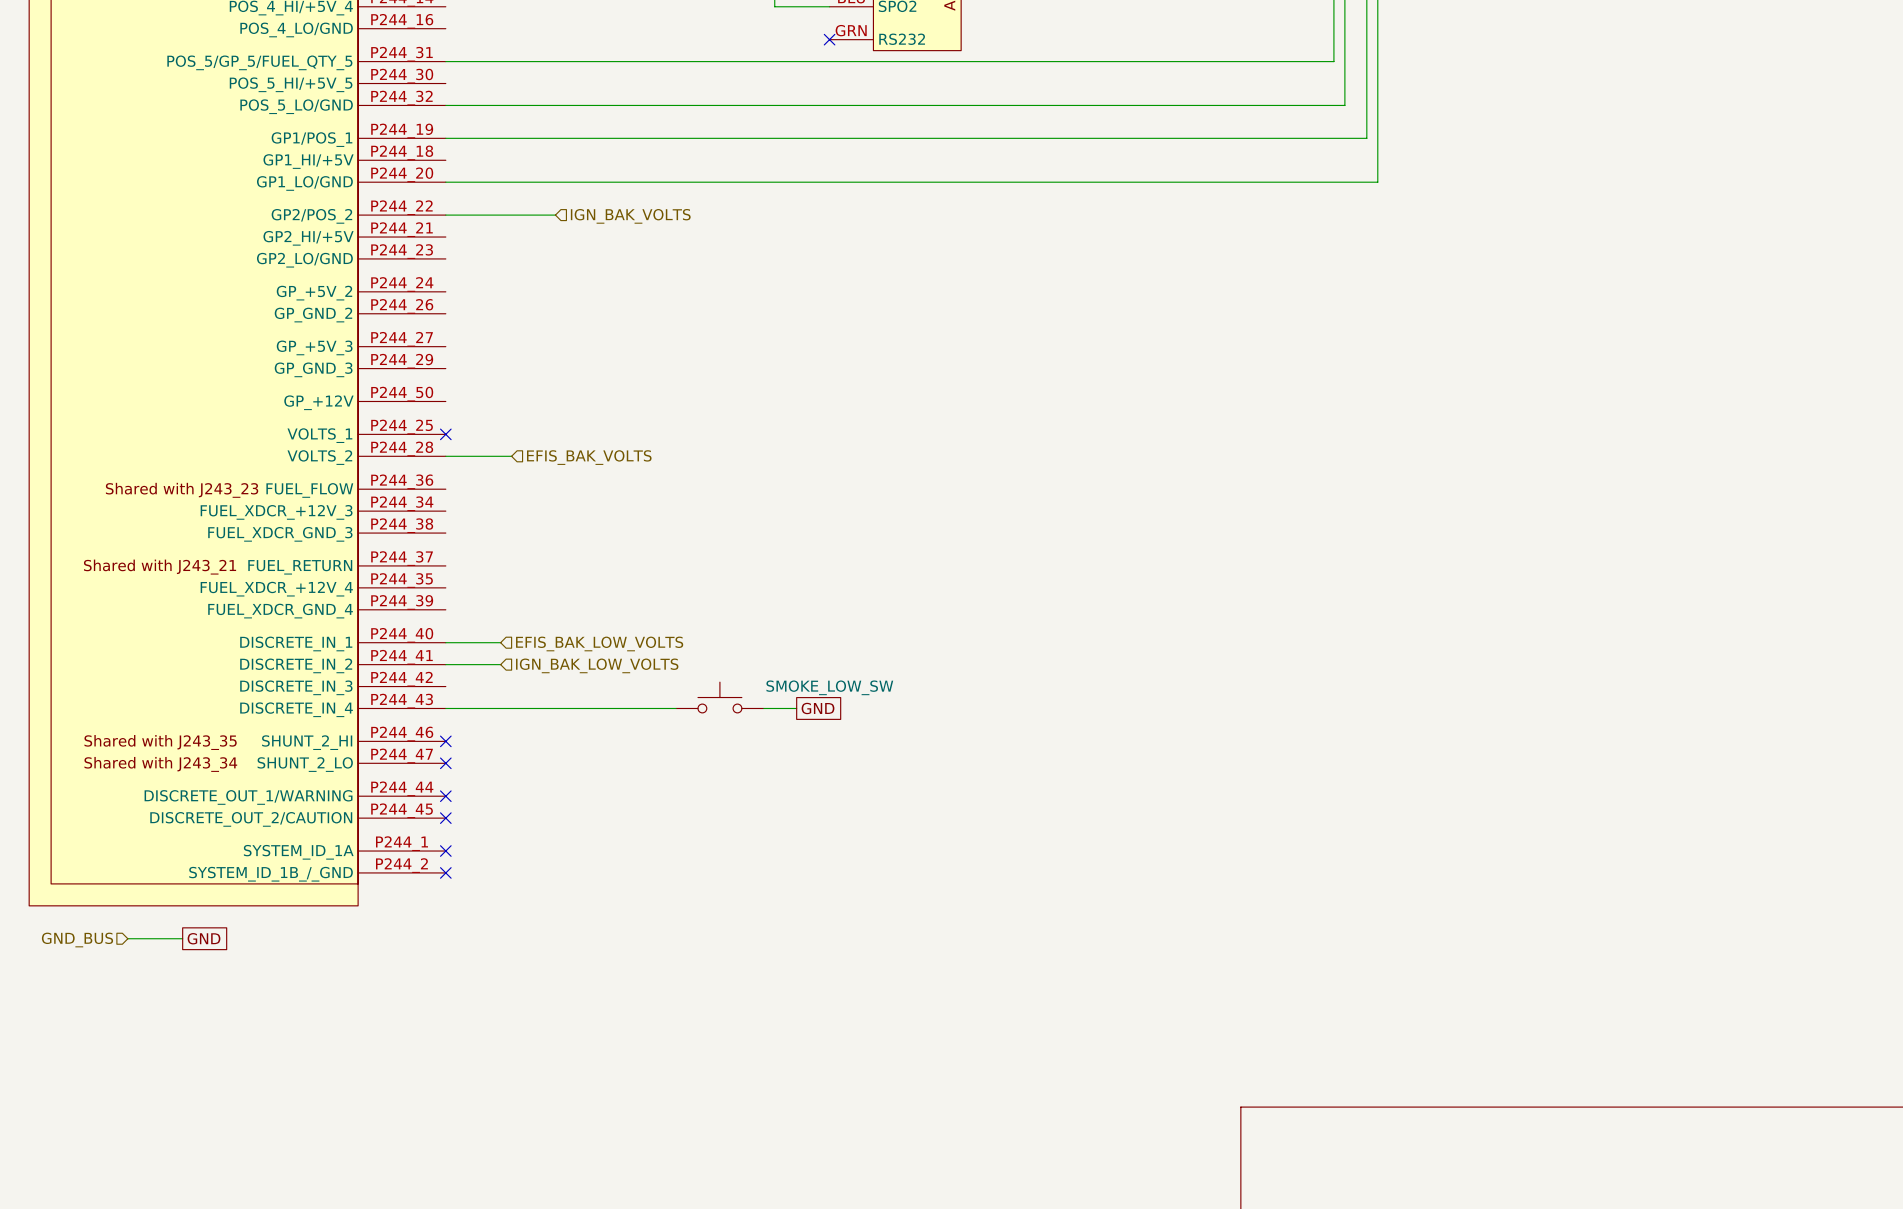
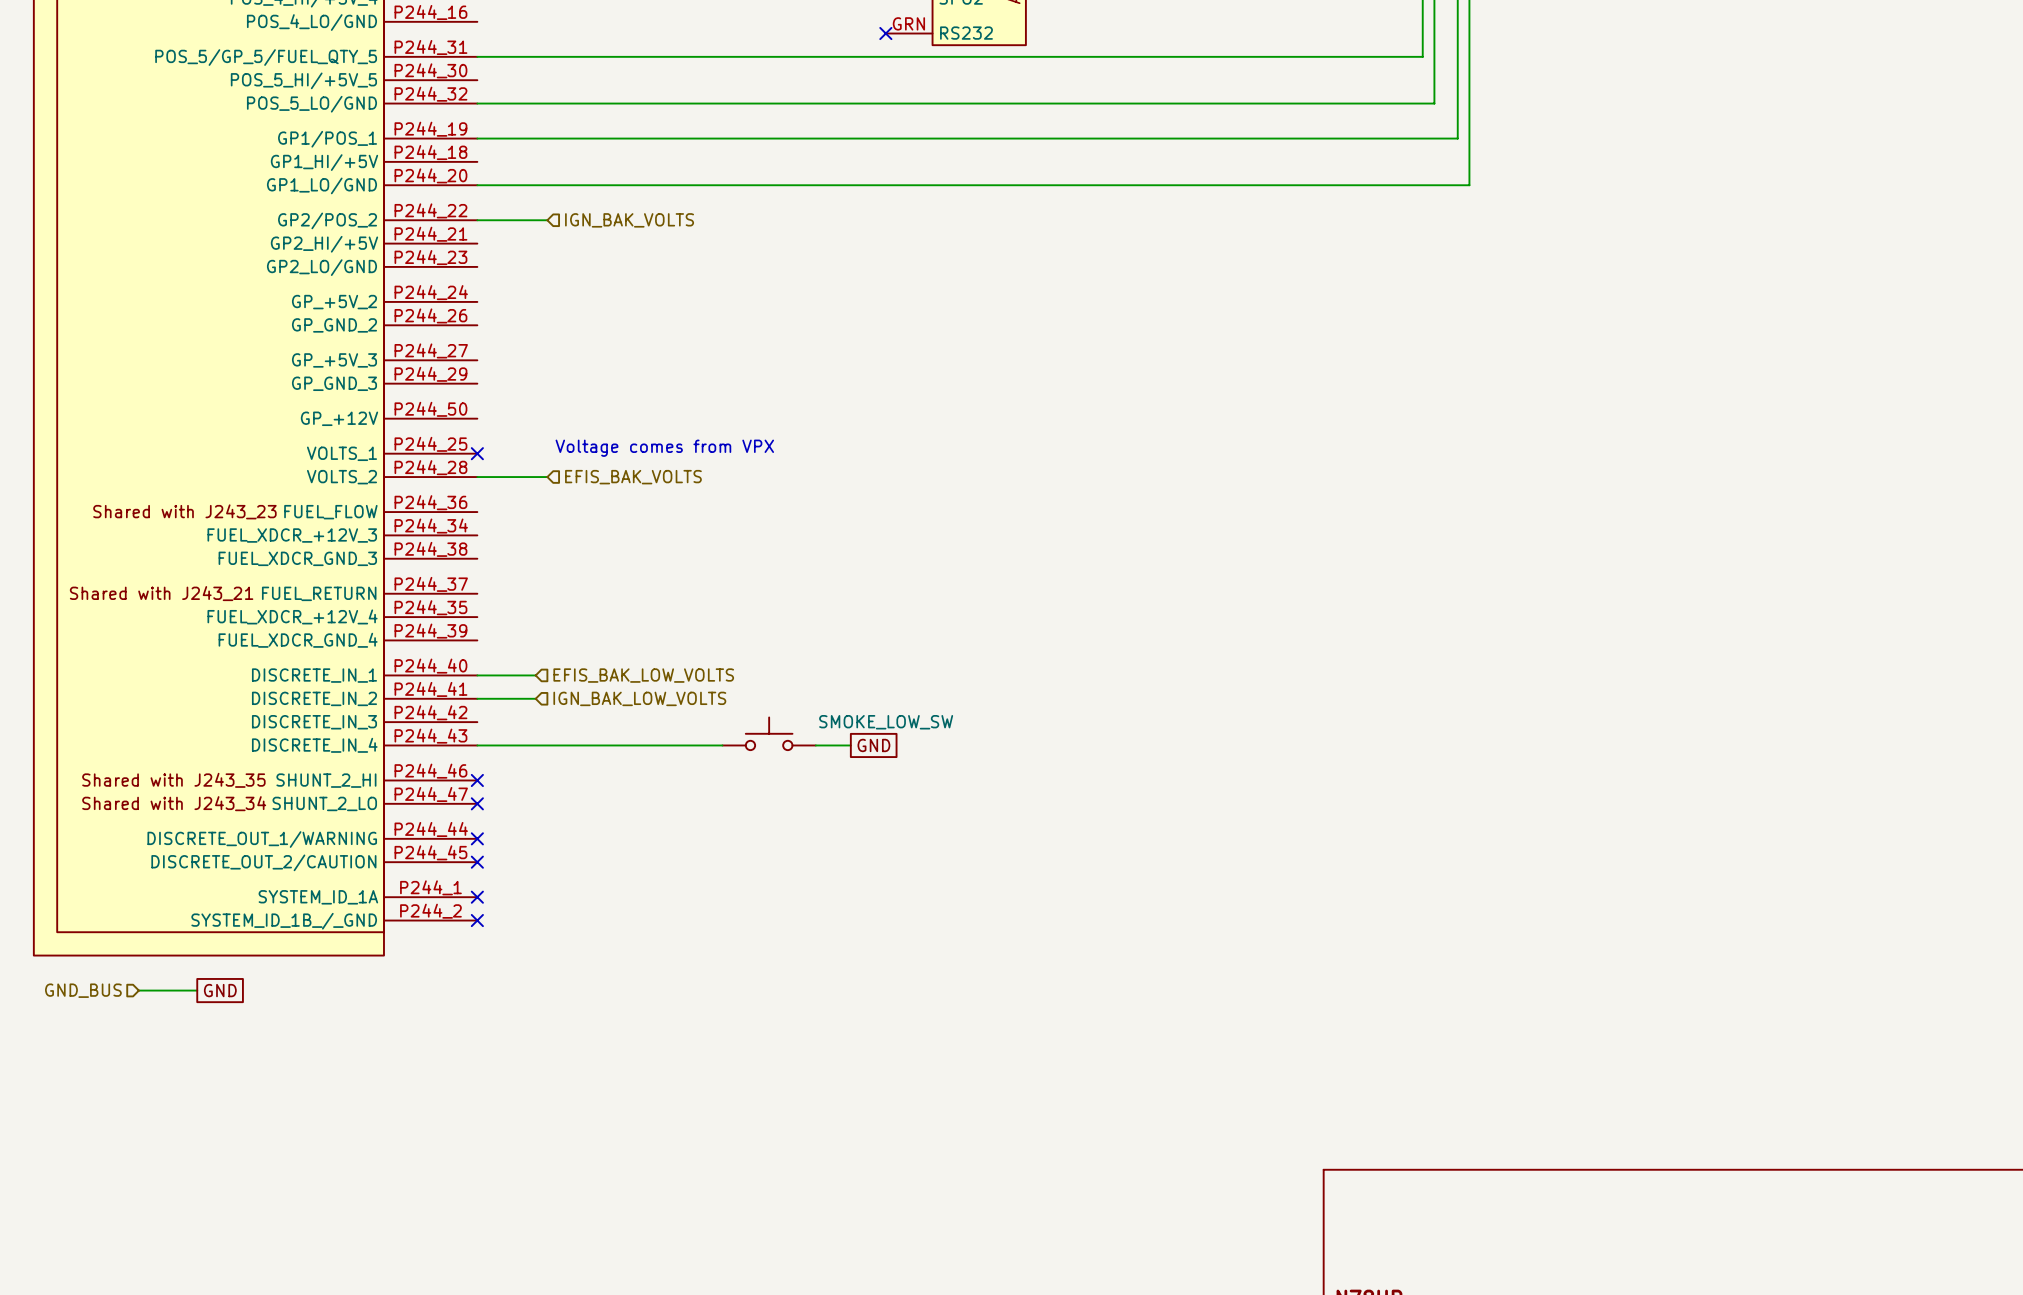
wire: (511, 215) (555, 215) -> none
hierarchical label position: IGN_BAK_VOLTS (630, 216) -> IGN_BAK_VOLTS (629, 220)
text: none -> Voltage comes from VPX (664, 448)

